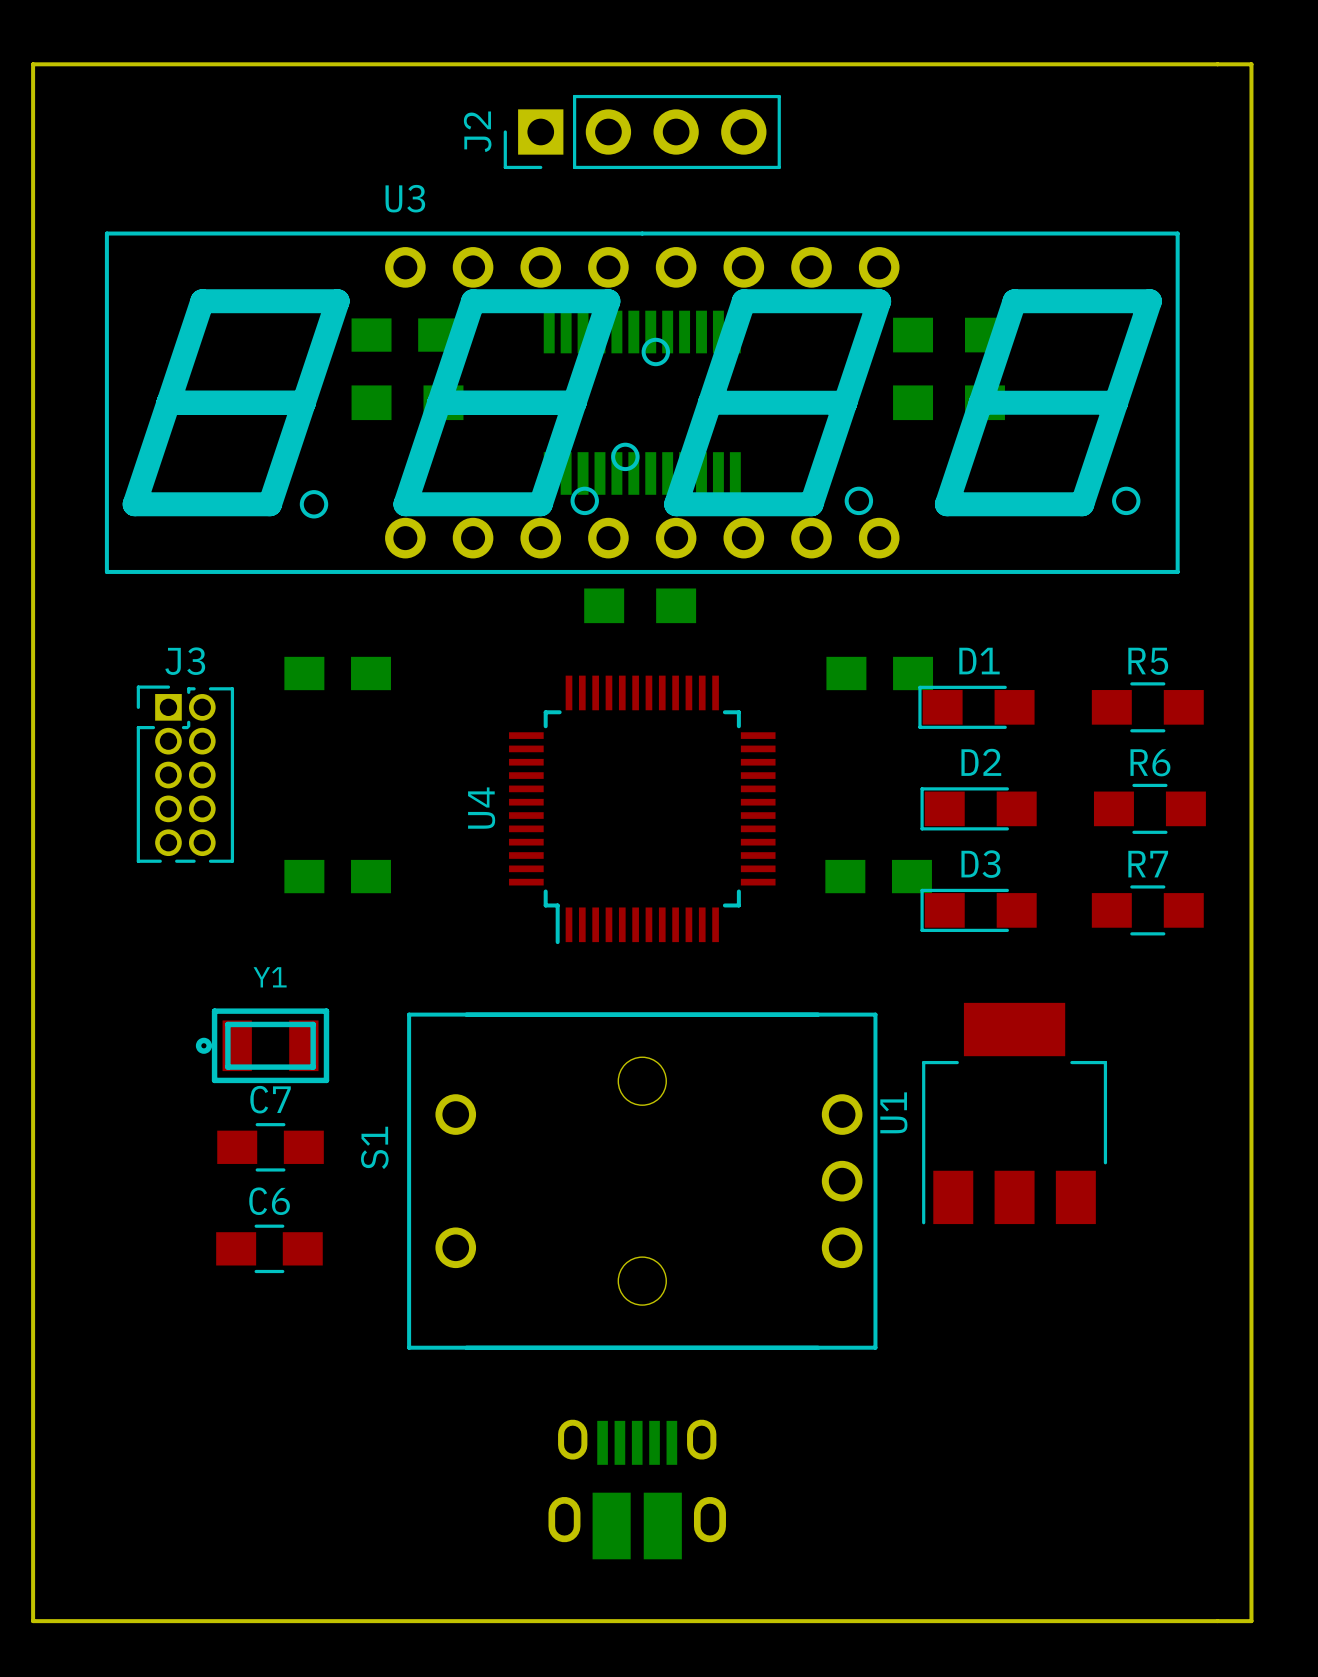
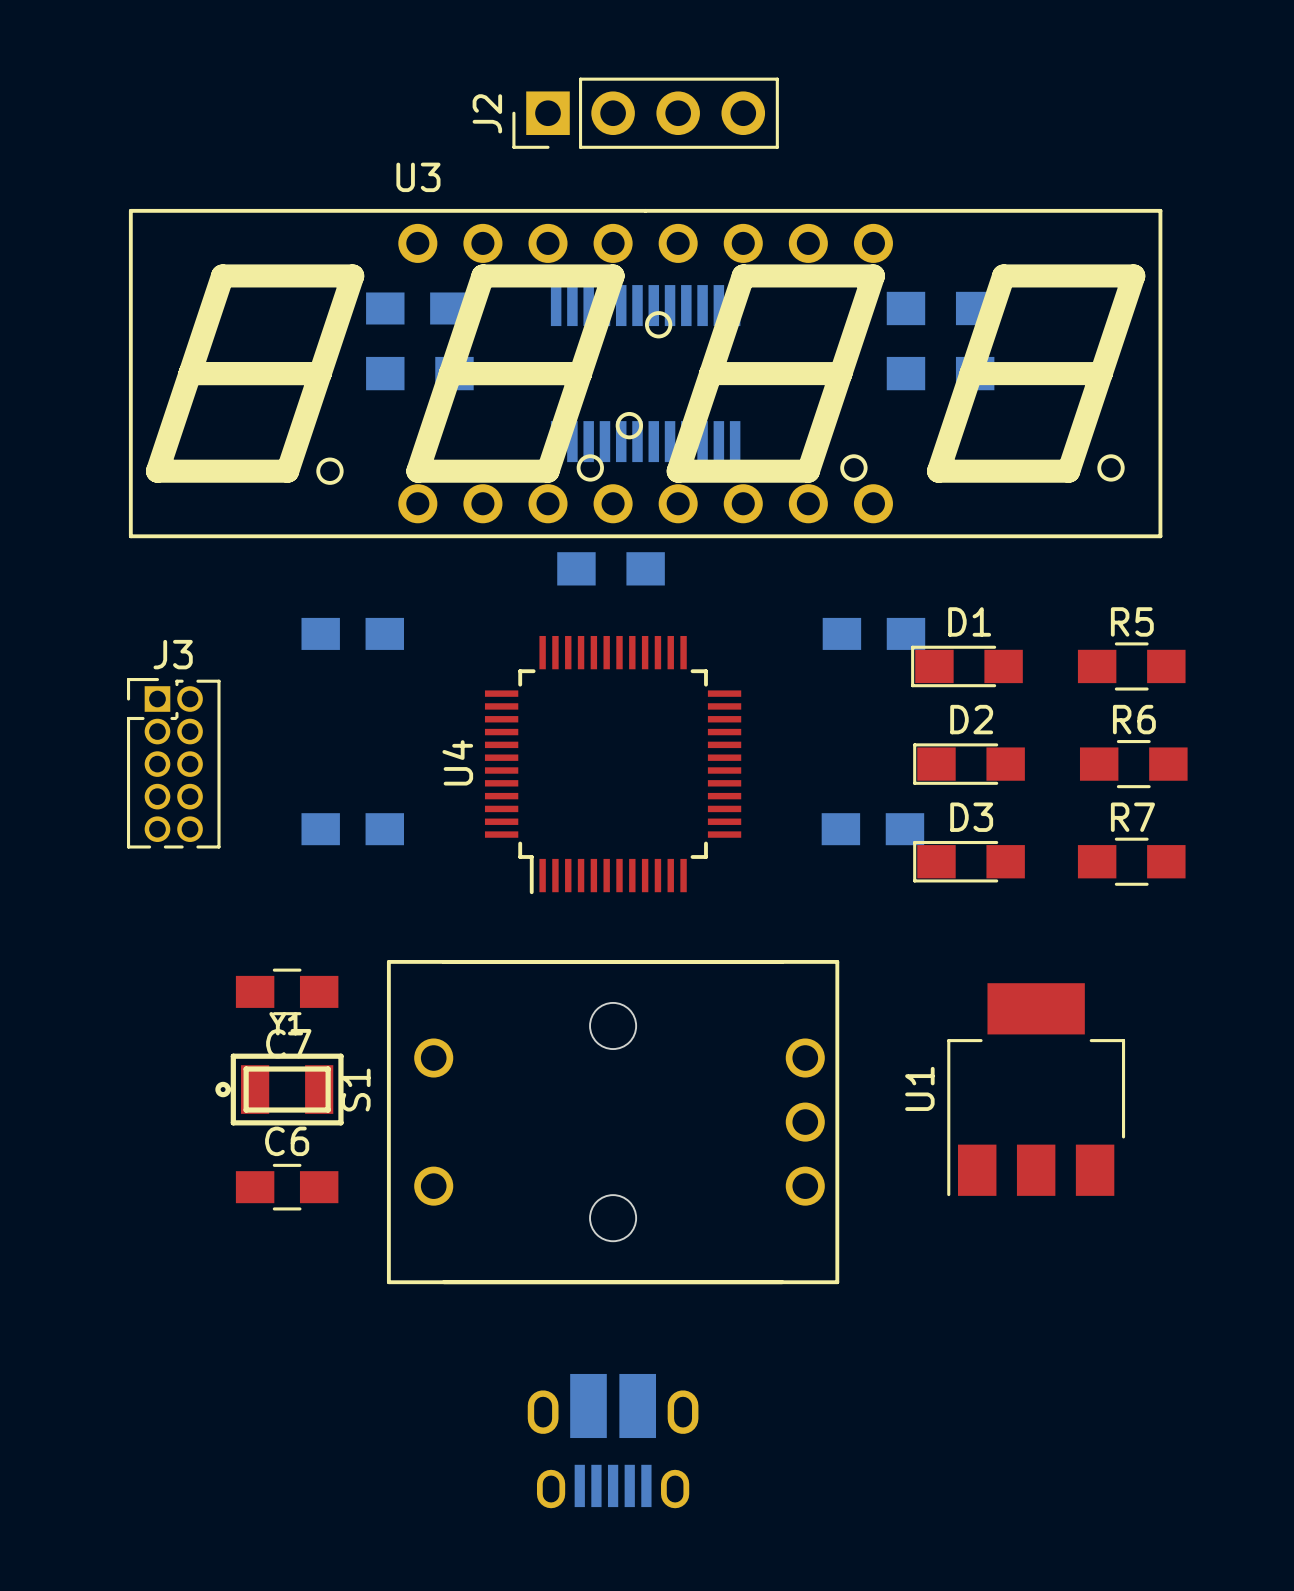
board edge: (33, 64) (1251, 64) (1251, 1621) (33, 1621) (33, 64) -> none
part position: (640, 605) -> (611, 568)
J3 position: (185, 774) -> (173, 763)
U4 position: (642, 809) -> (613, 765)
Y1 position: (262, 1045) -> (279, 1089)
U1 position: (1014, 1113) -> (1036, 1089)
C7 position: (270, 1147) -> (287, 991)
S1 position: (642, 1181) -> (613, 1122)
part rotation: 0° (637, 1489) -> 180° (613, 1441)

